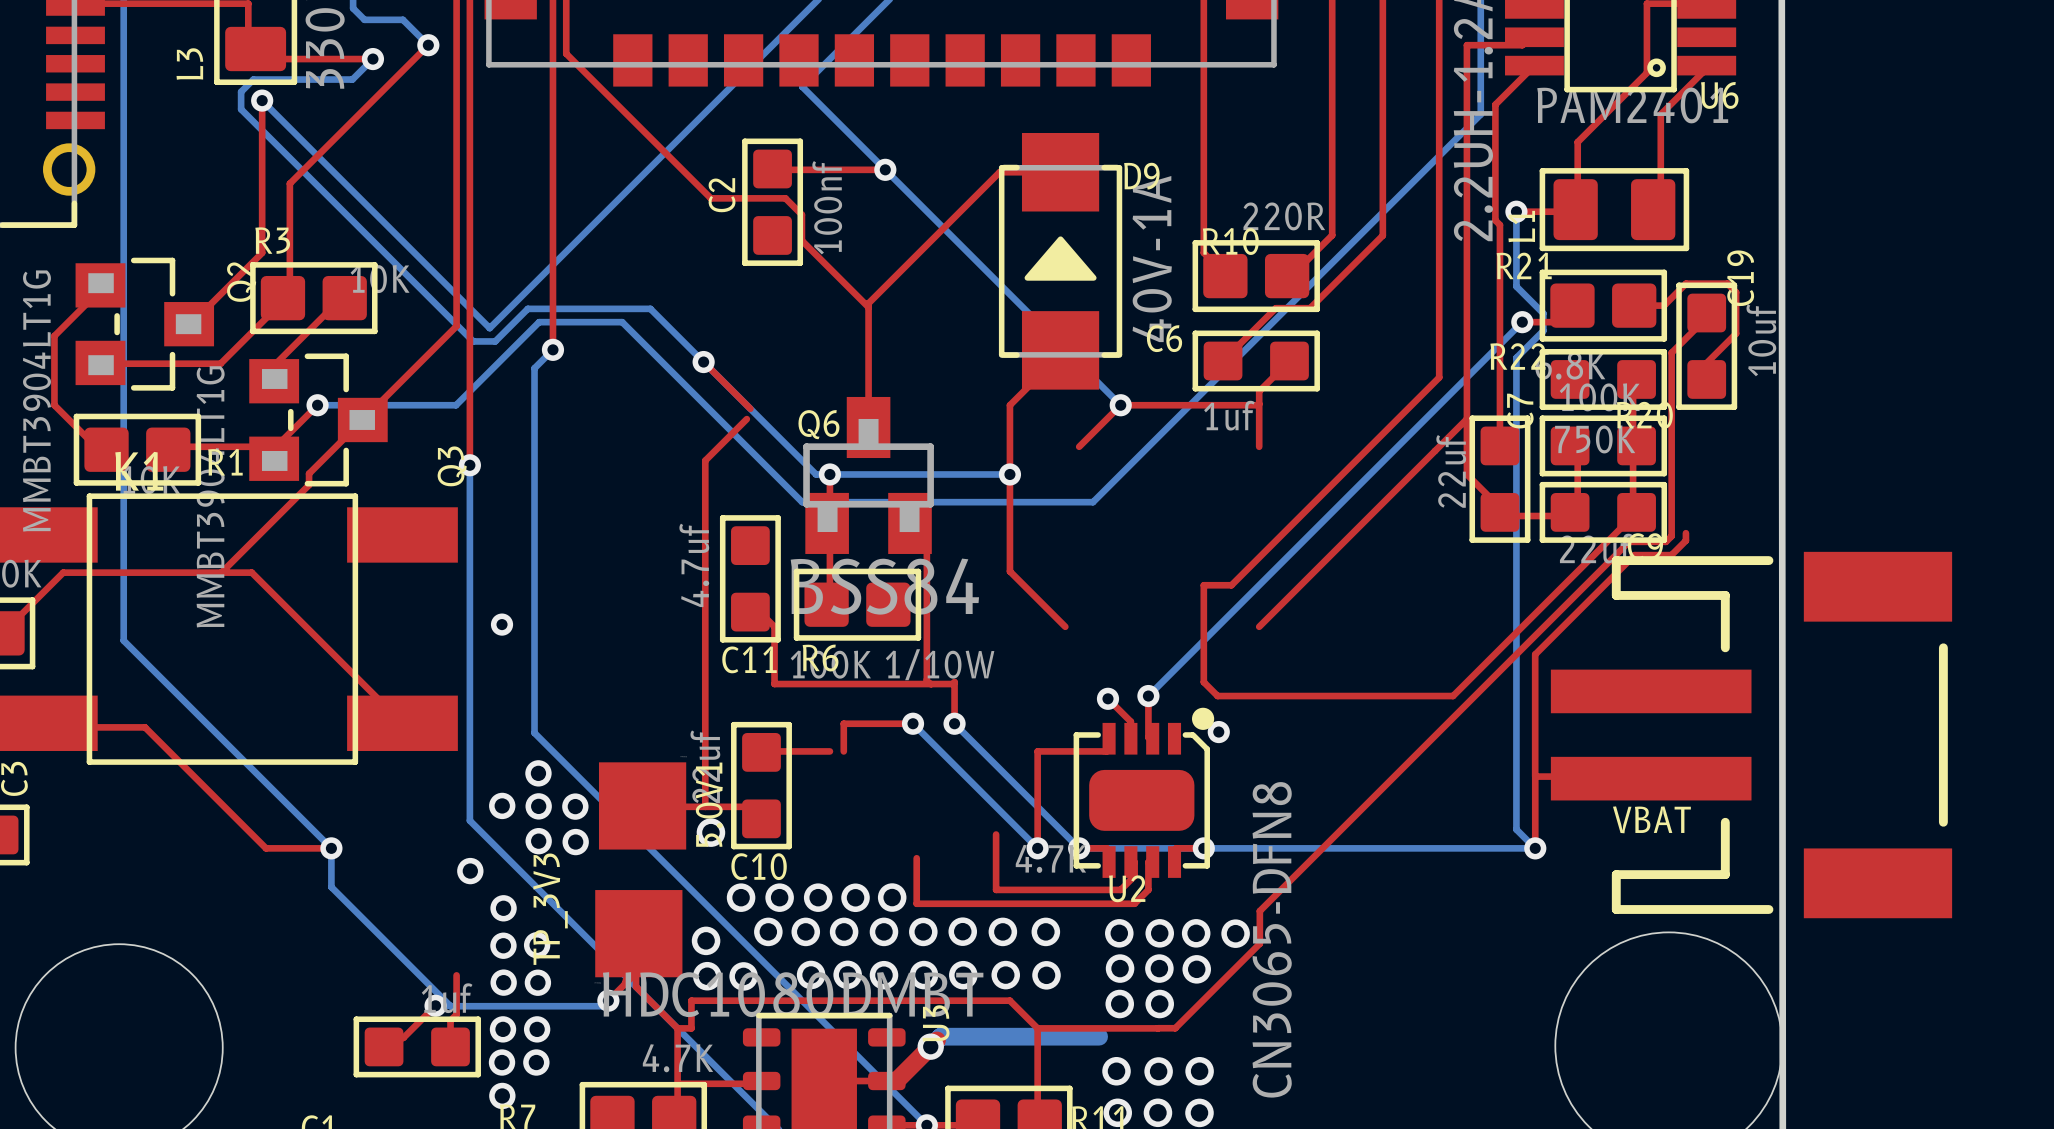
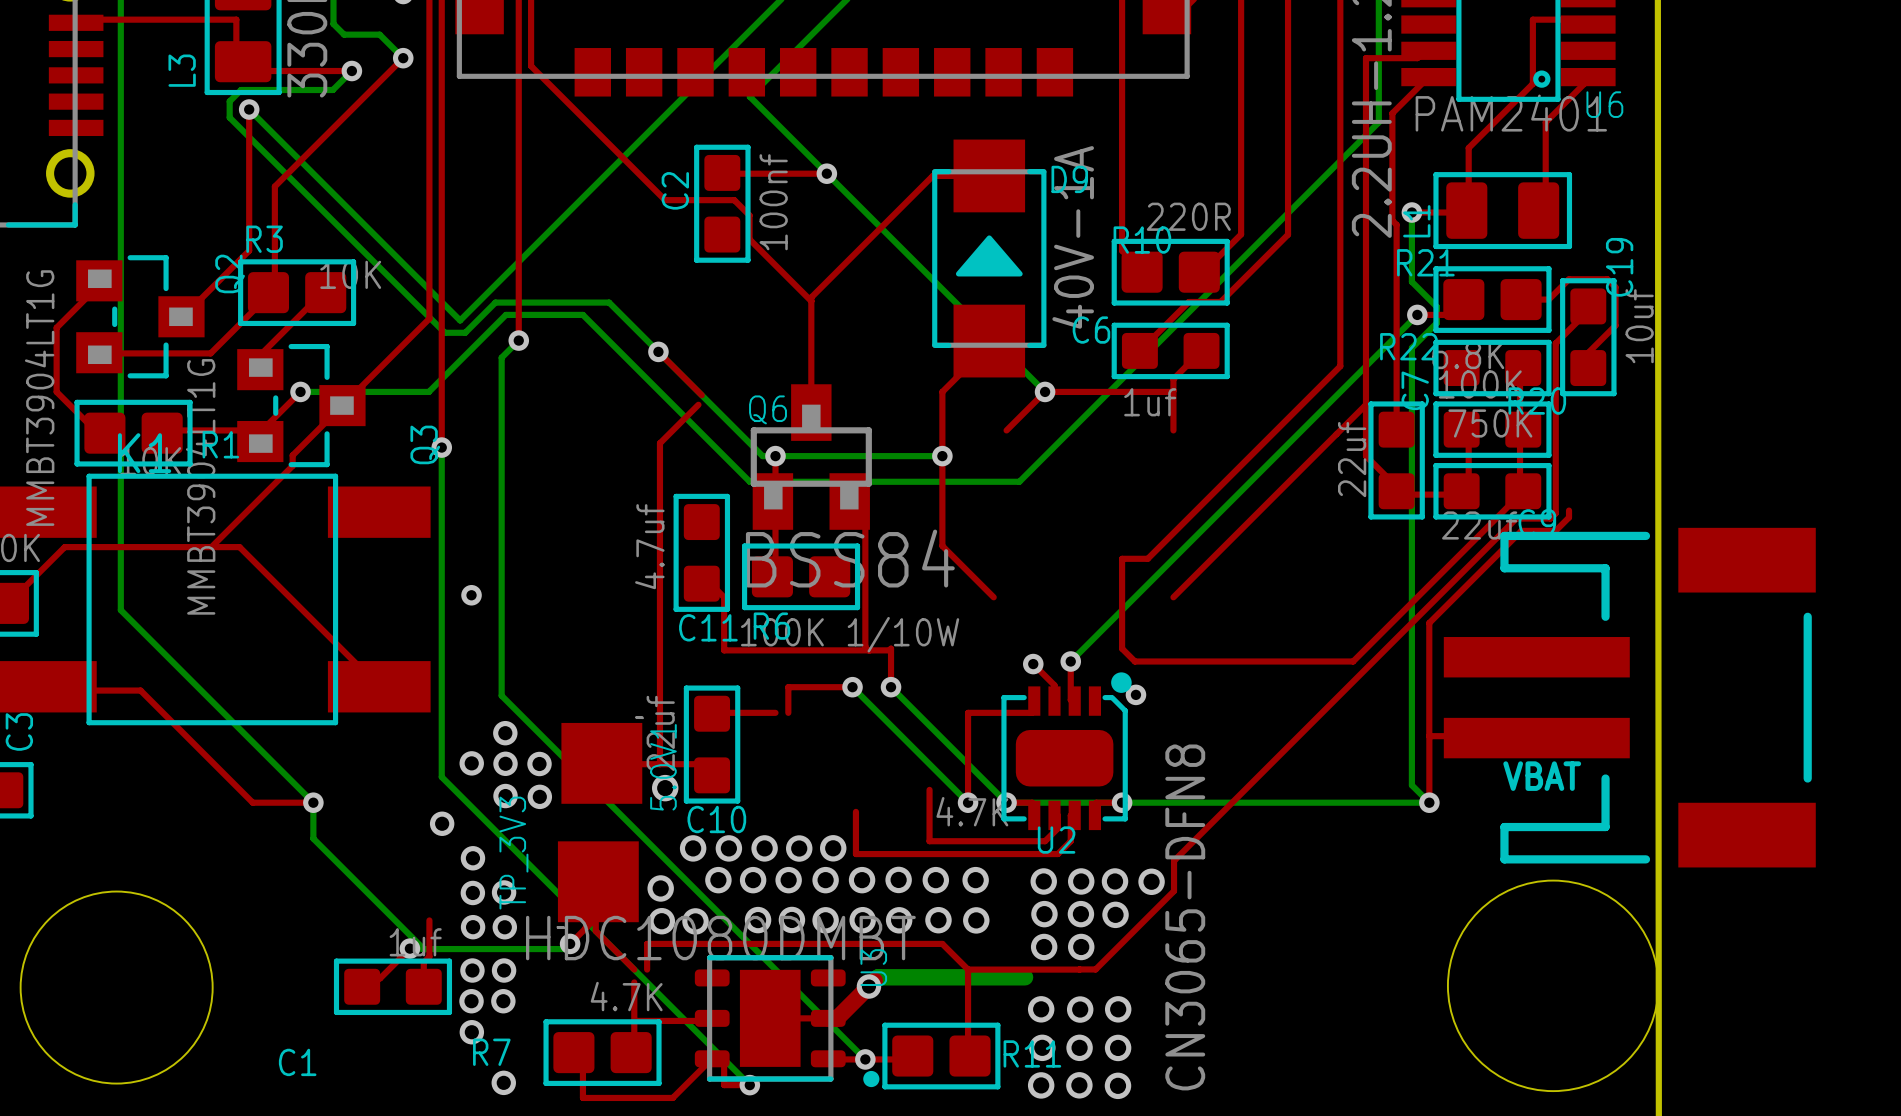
top track: (691, 1028) (677, 1028) (677, 1042) -> none

